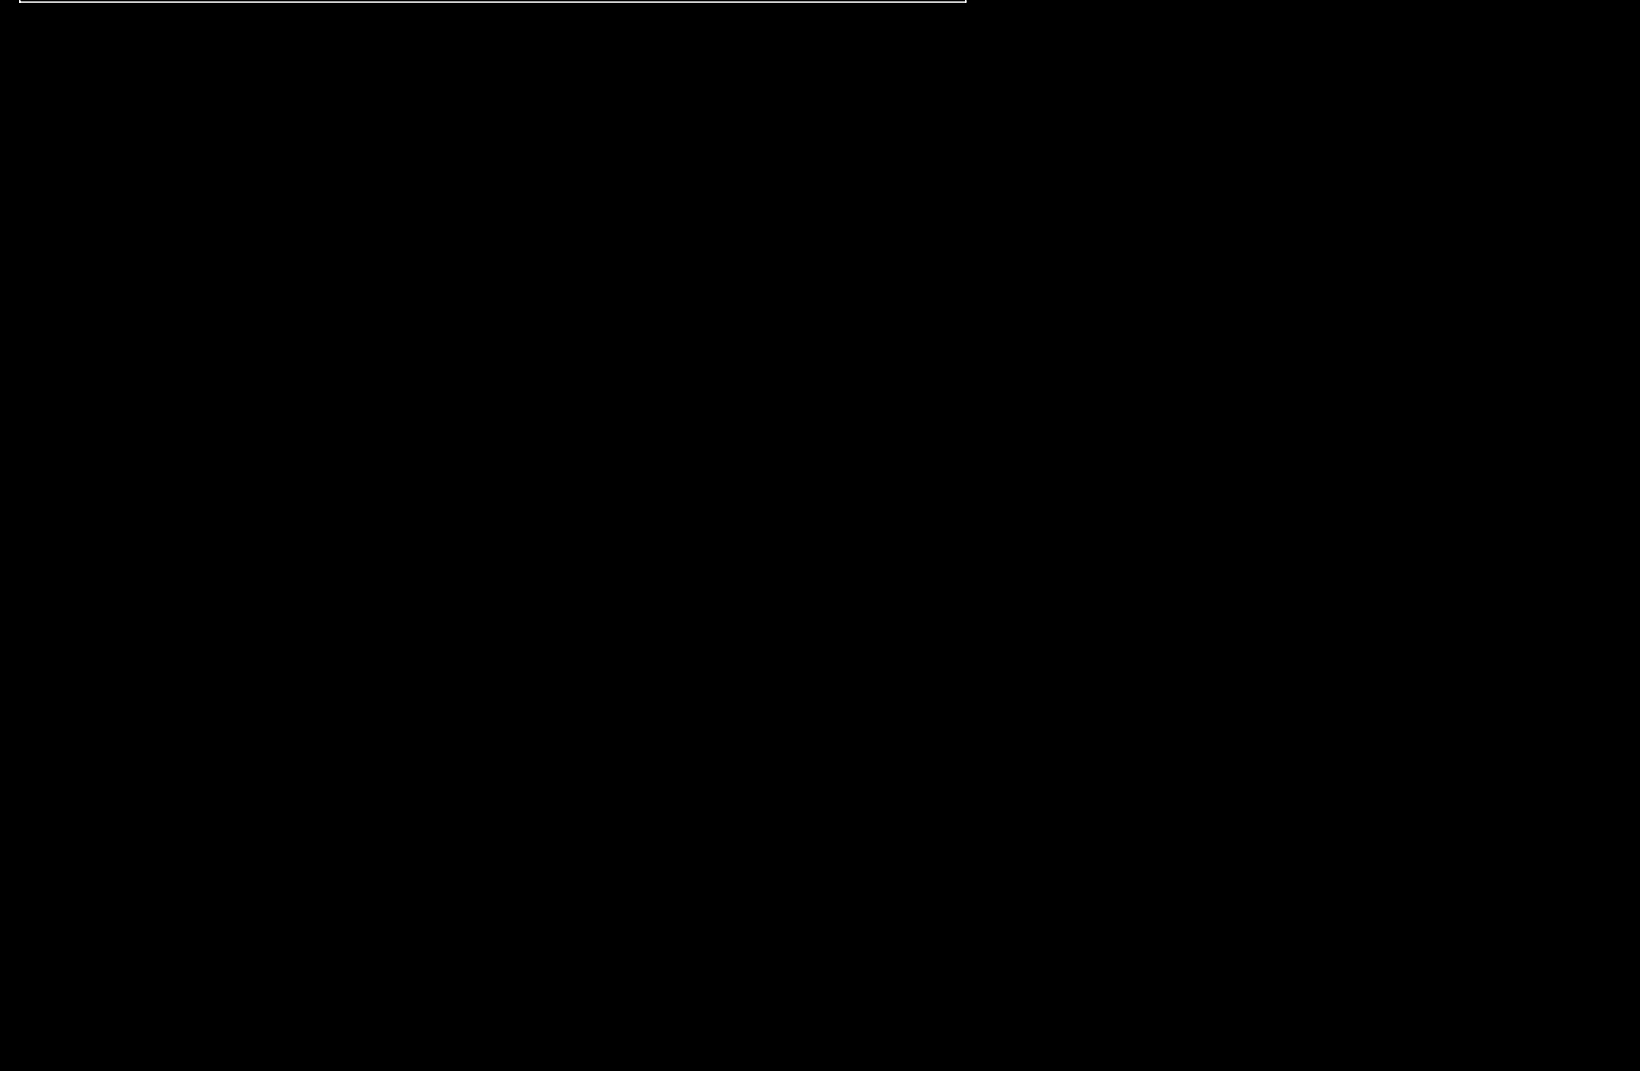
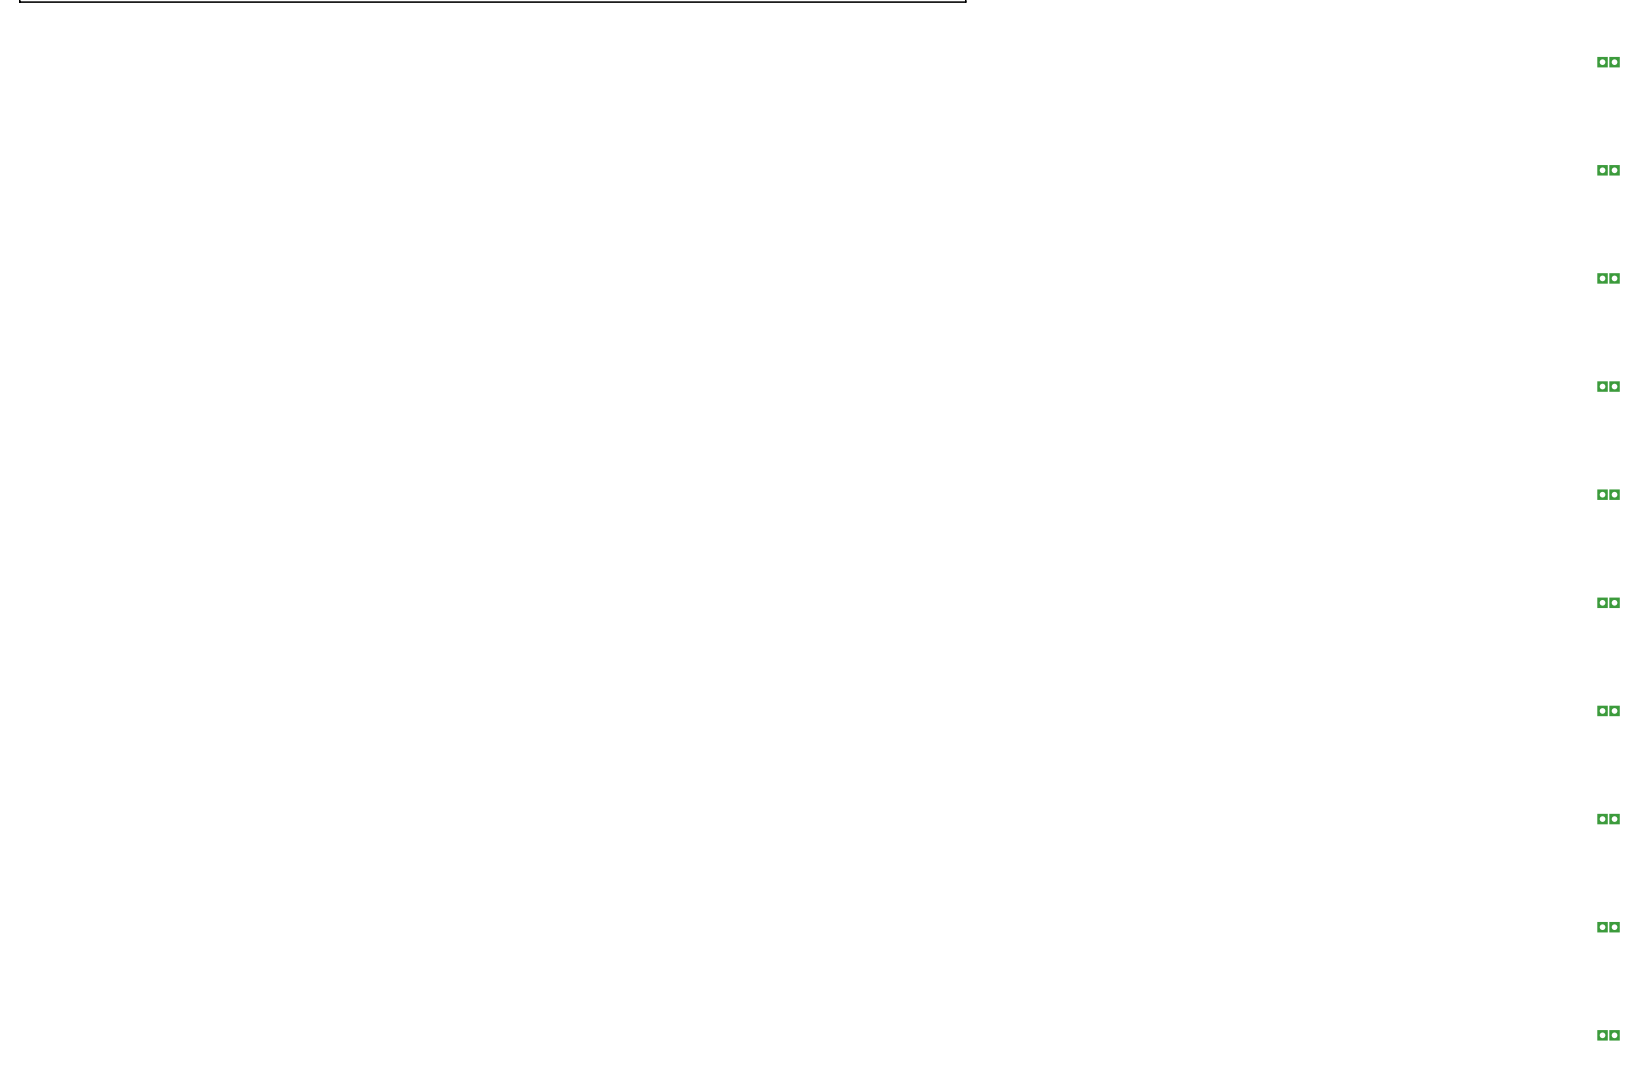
part: none -> (1608, 62)
part: none -> (1608, 170)
part: none -> (1608, 278)
part: none -> (1608, 386)
part: none -> (1608, 494)
part: none -> (1608, 602)
part: none -> (1608, 710)
part: none -> (1608, 819)
part: none -> (1608, 927)
part: none -> (1608, 1035)

